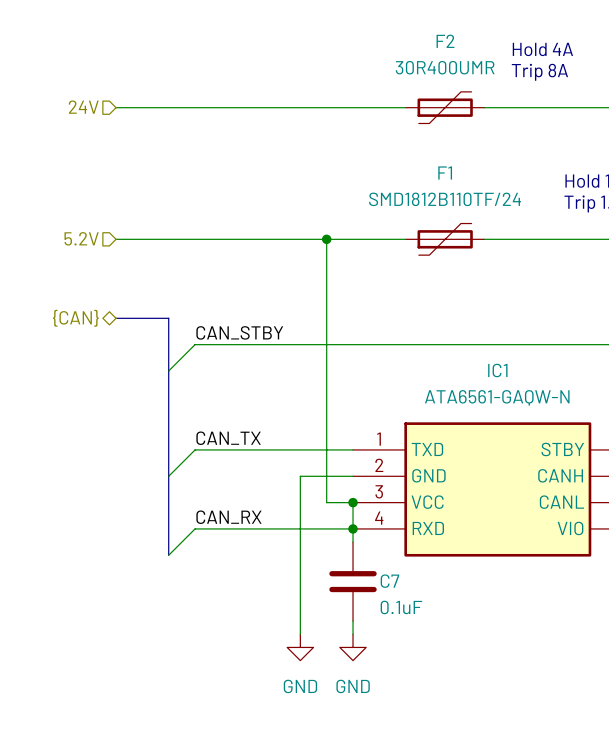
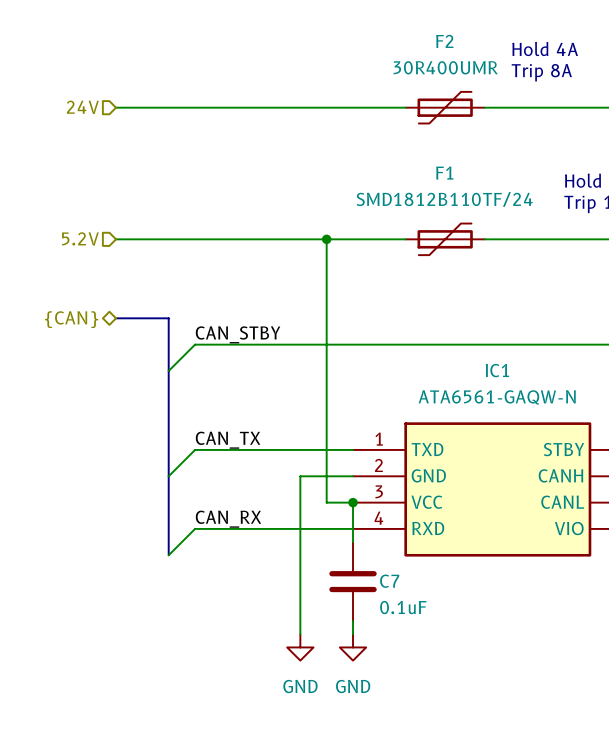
junction: (353, 528) -> none

